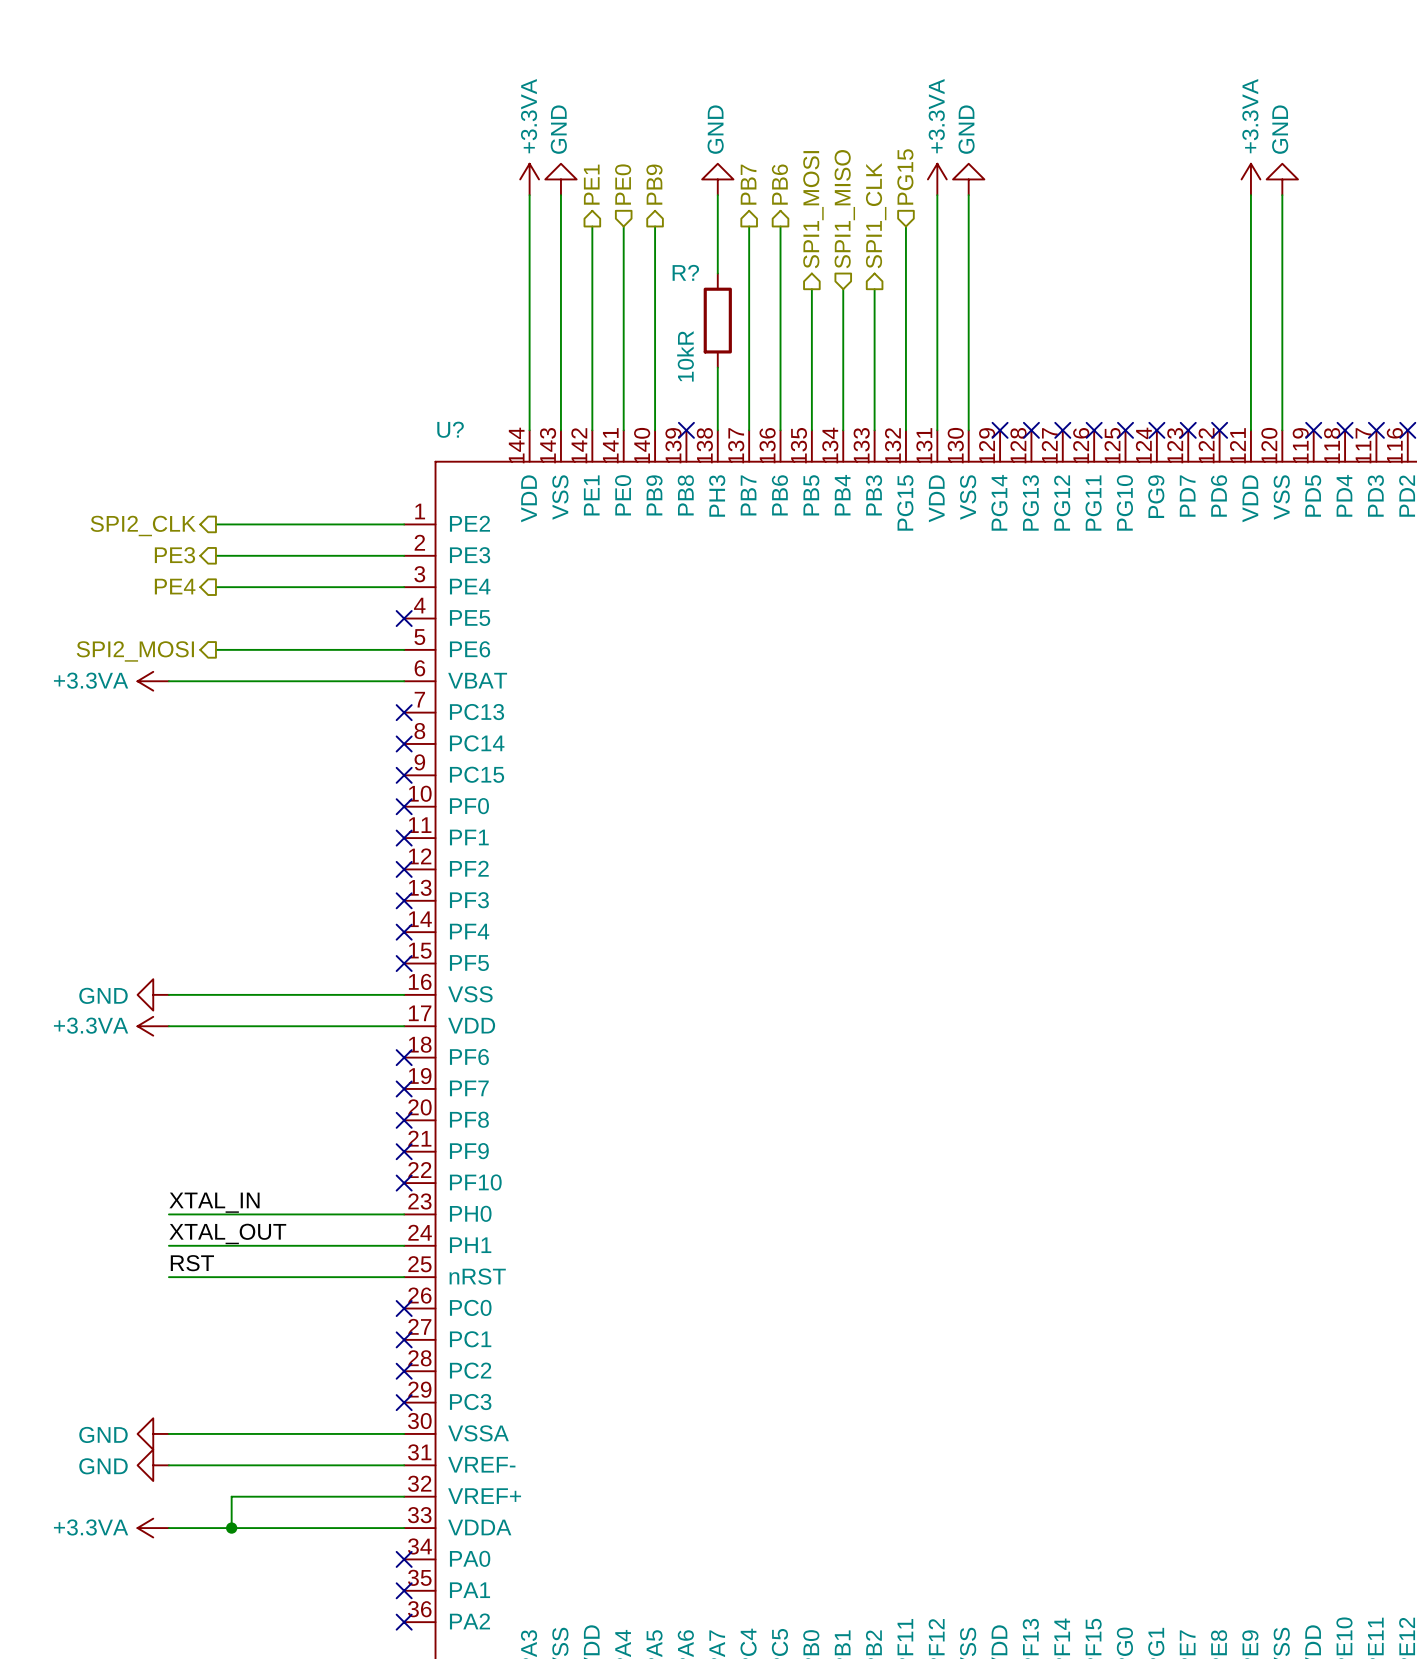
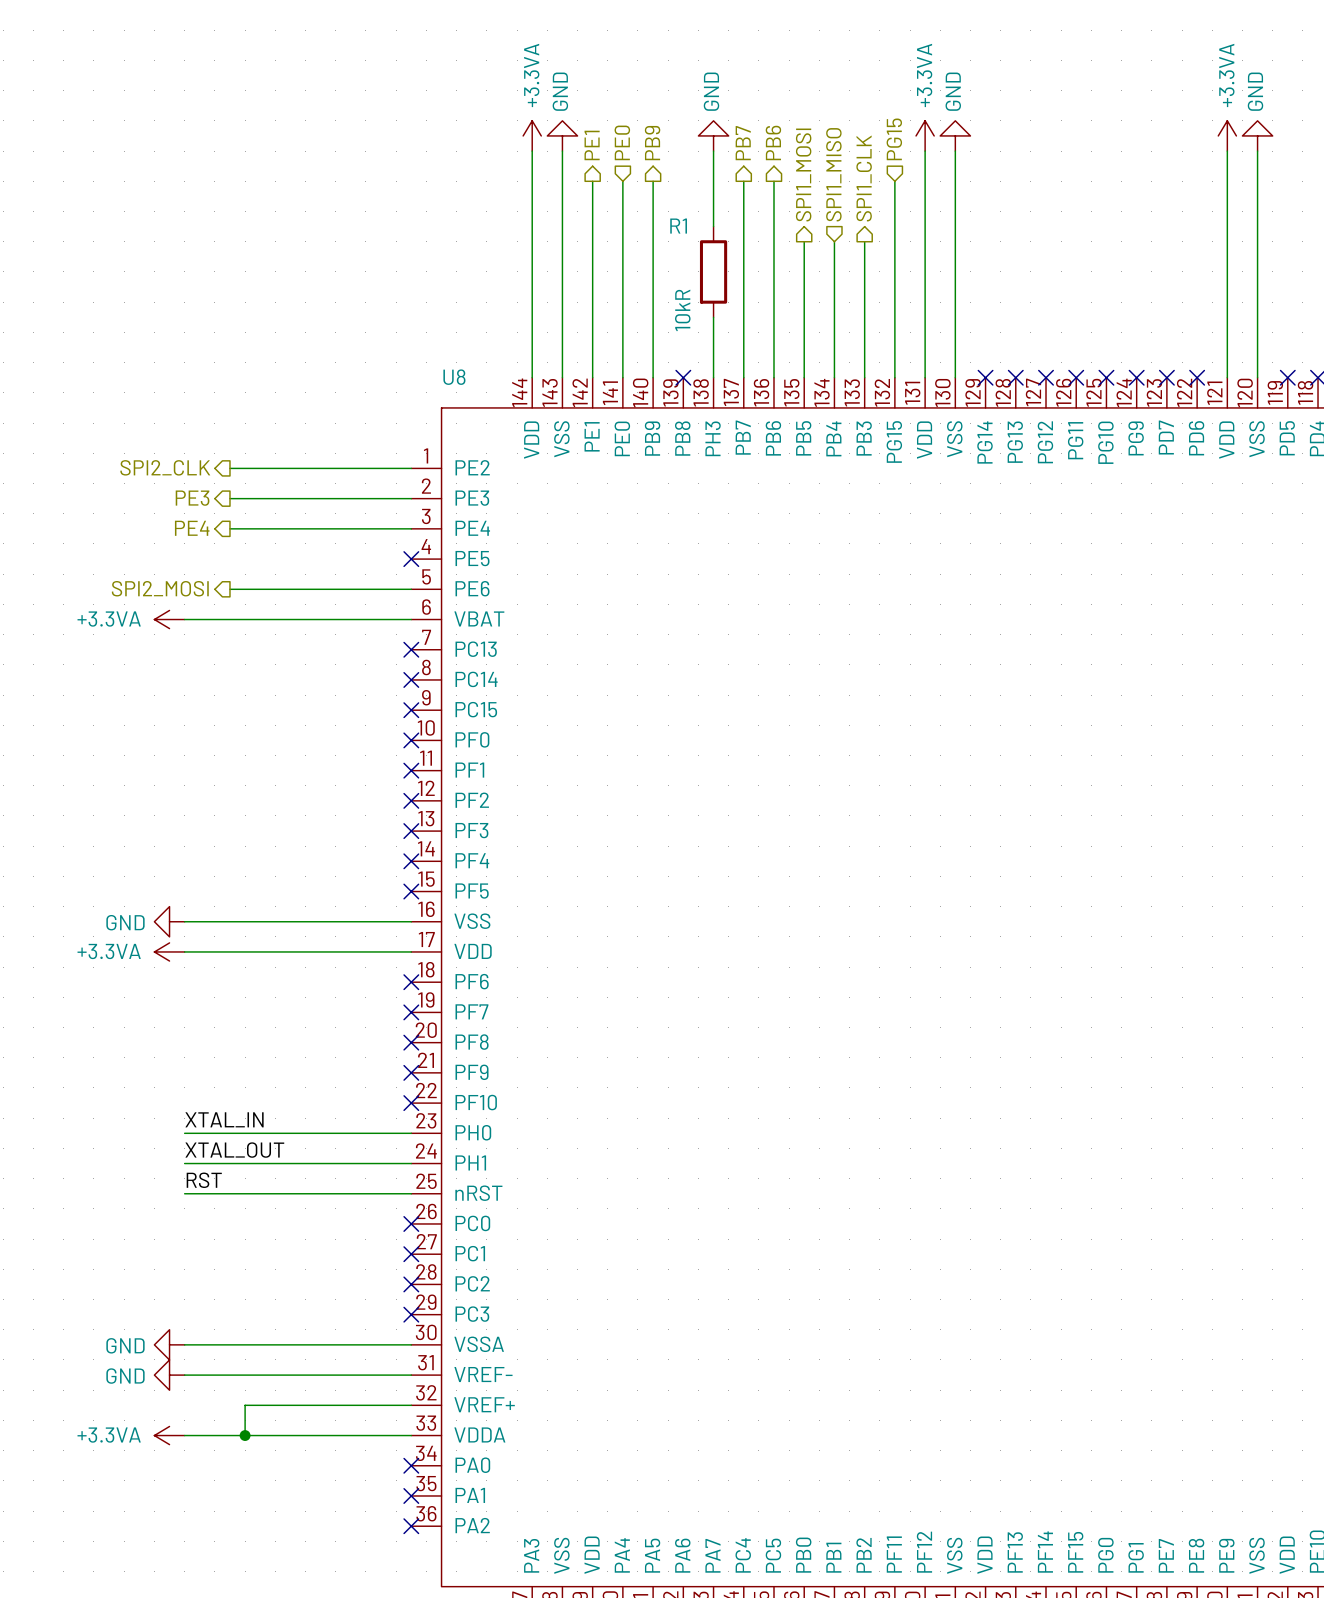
R? name: R? (685, 272) -> R1 (678, 226)
U? name: U? (450, 429) -> U8 (454, 377)

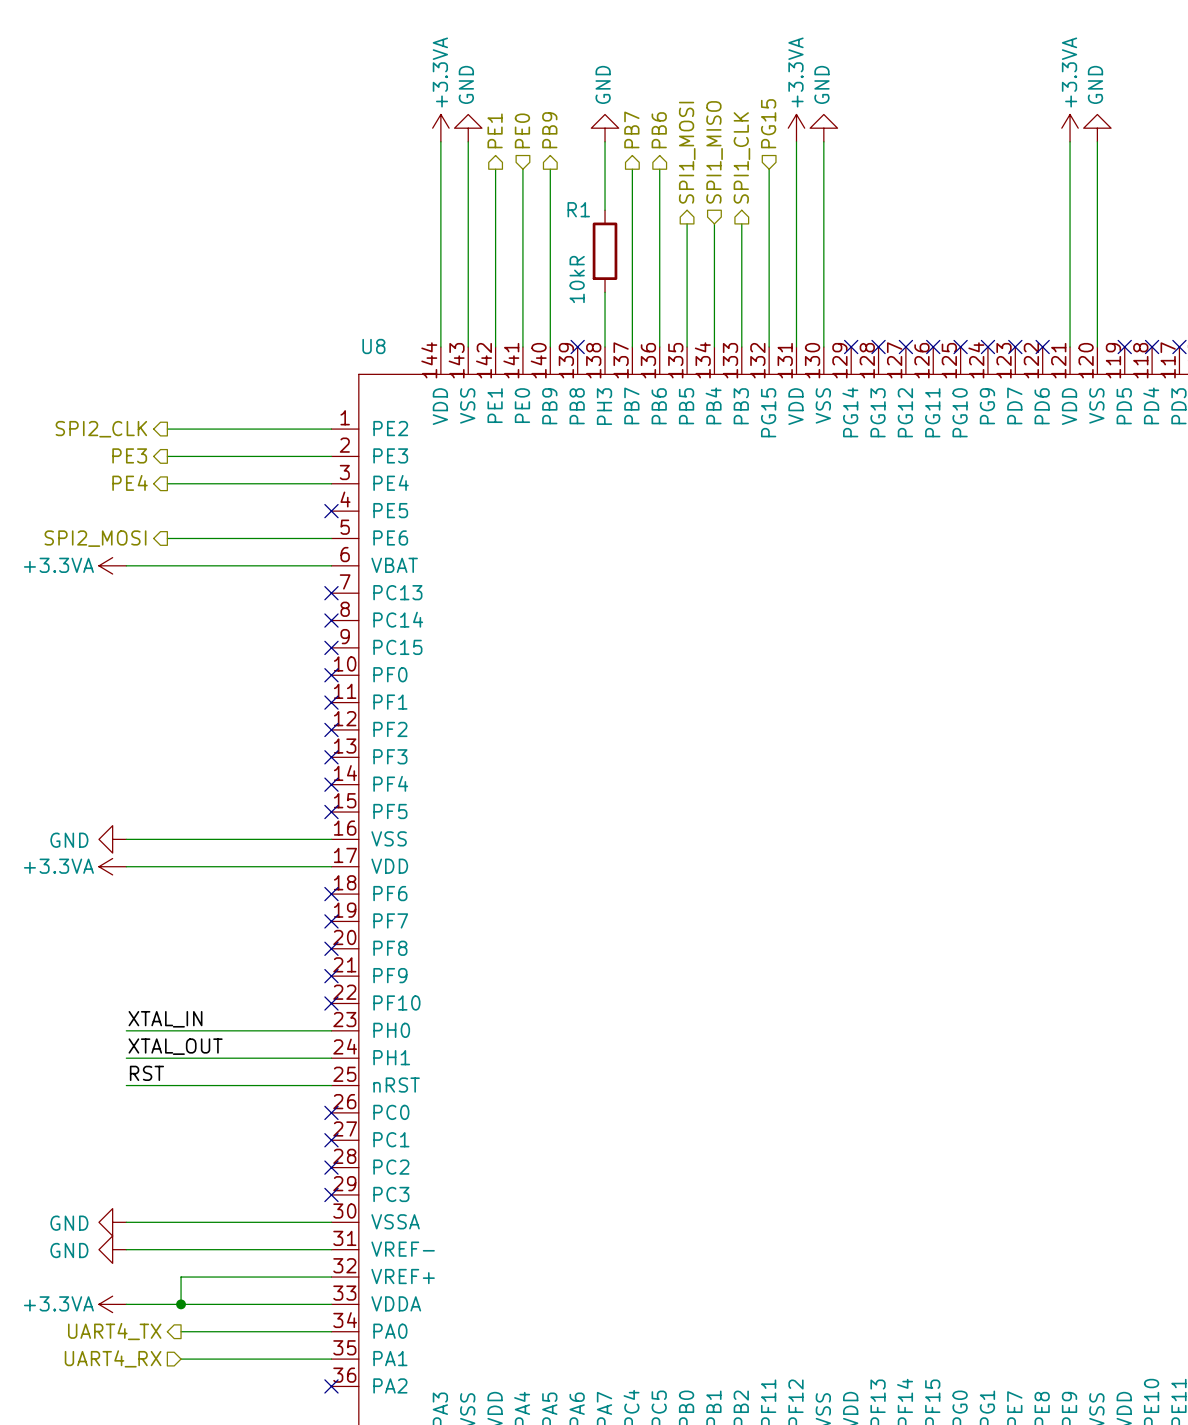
hierarchical label: none -> UART4_TX (114, 1331)
wire: none -> (181, 1331) (331, 1331)
no-connect mark: (411, 1465) -> none
hierarchical label: none -> UART4_RX (113, 1358)
wire: none -> (181, 1359) (331, 1359)
no-connect mark: (411, 1495) -> none

